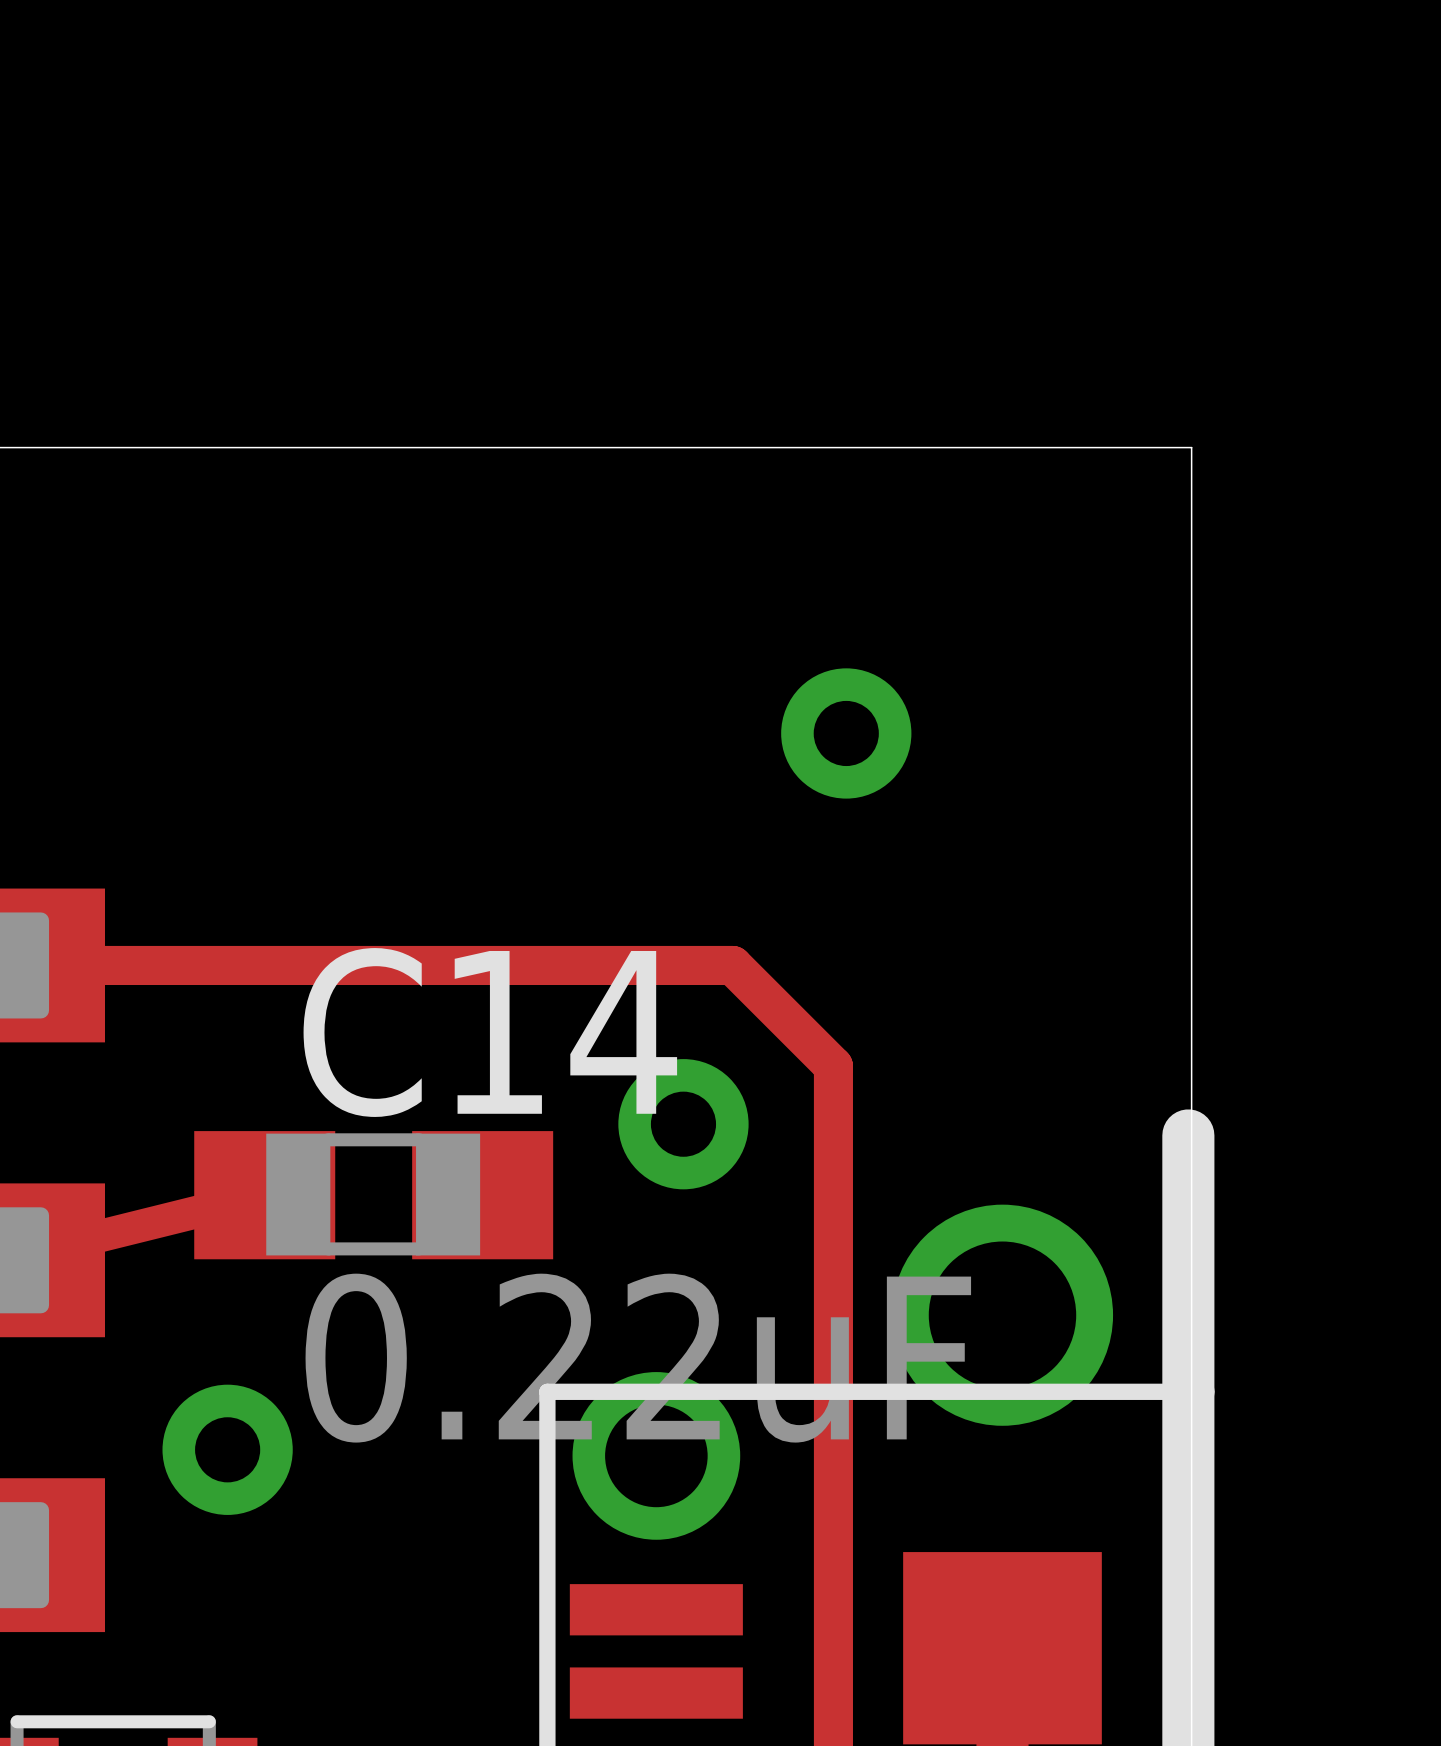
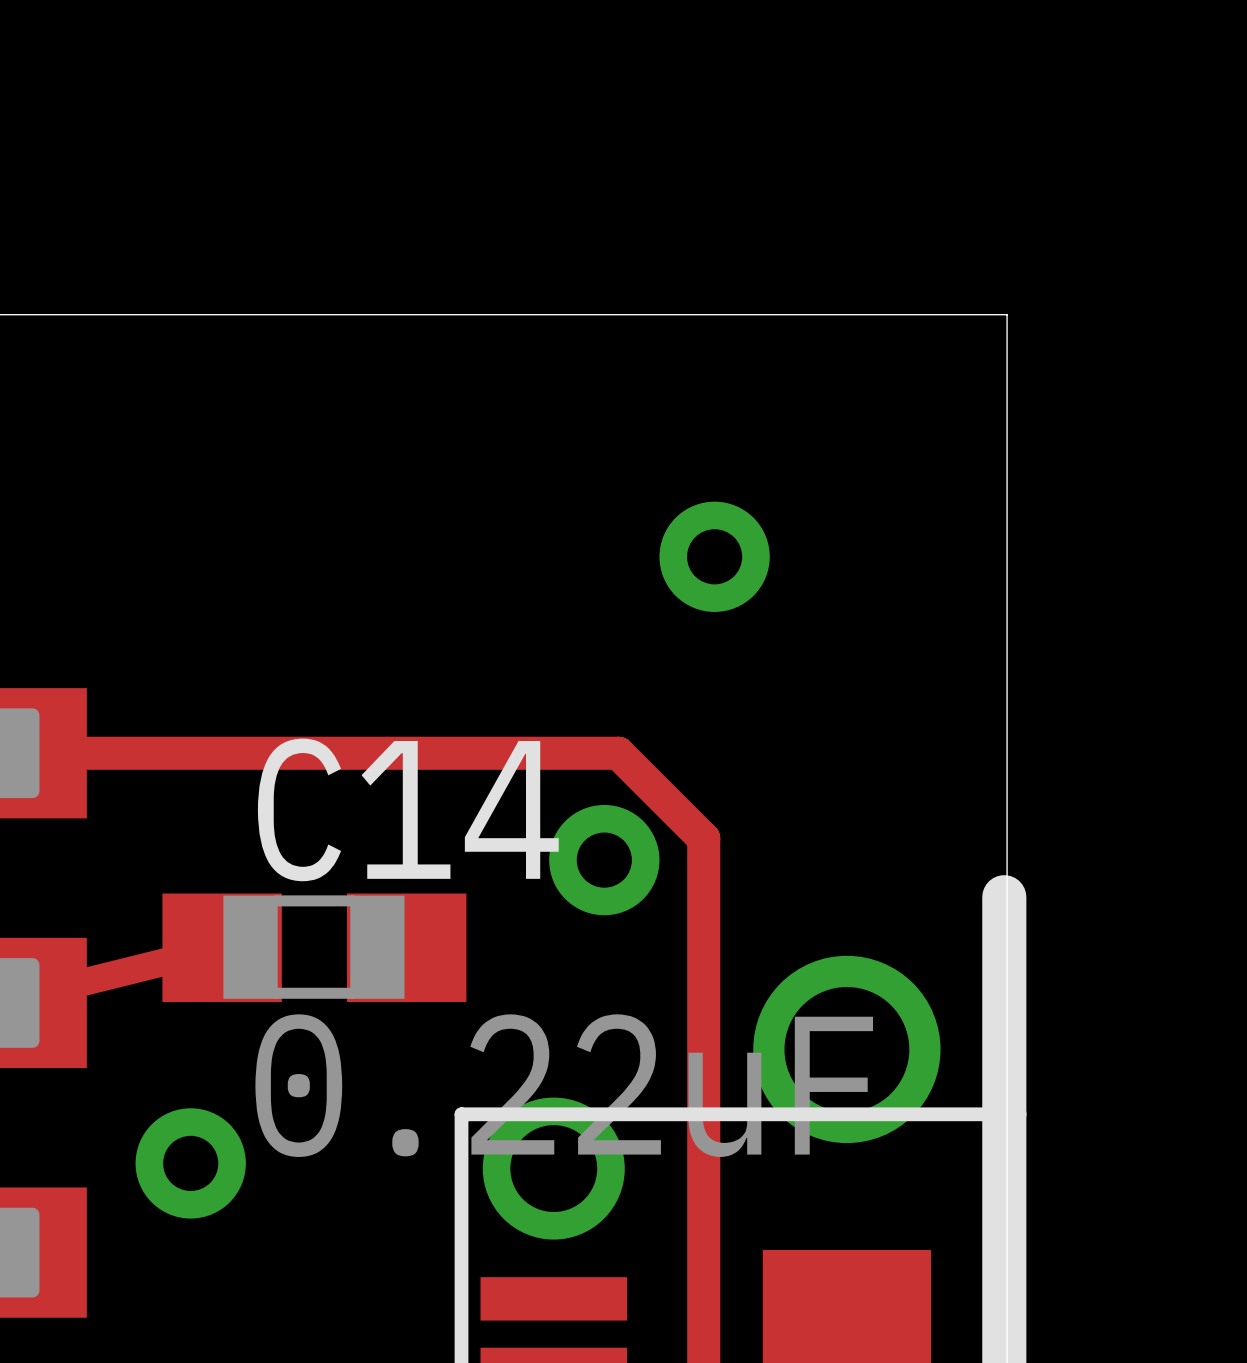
via position: (683, 1124) -> (604, 860)

